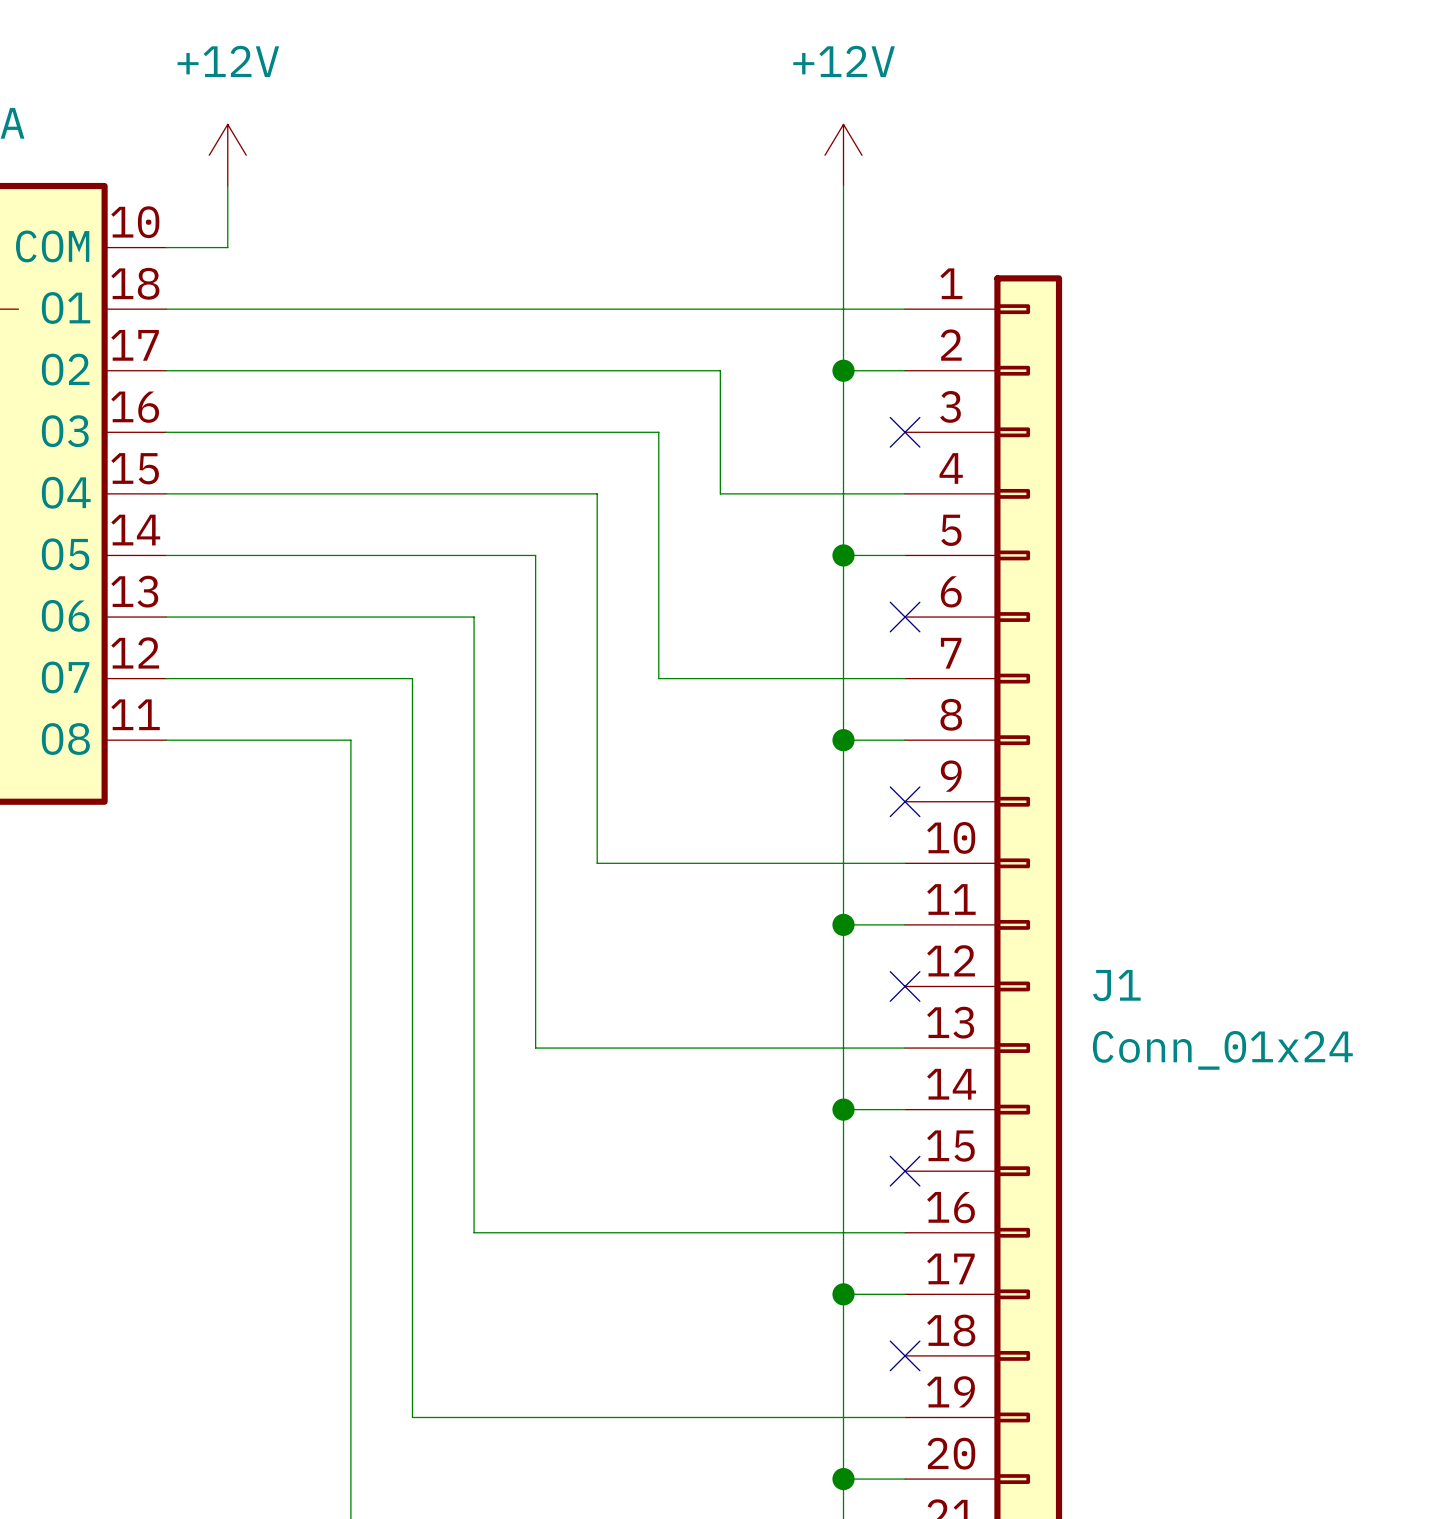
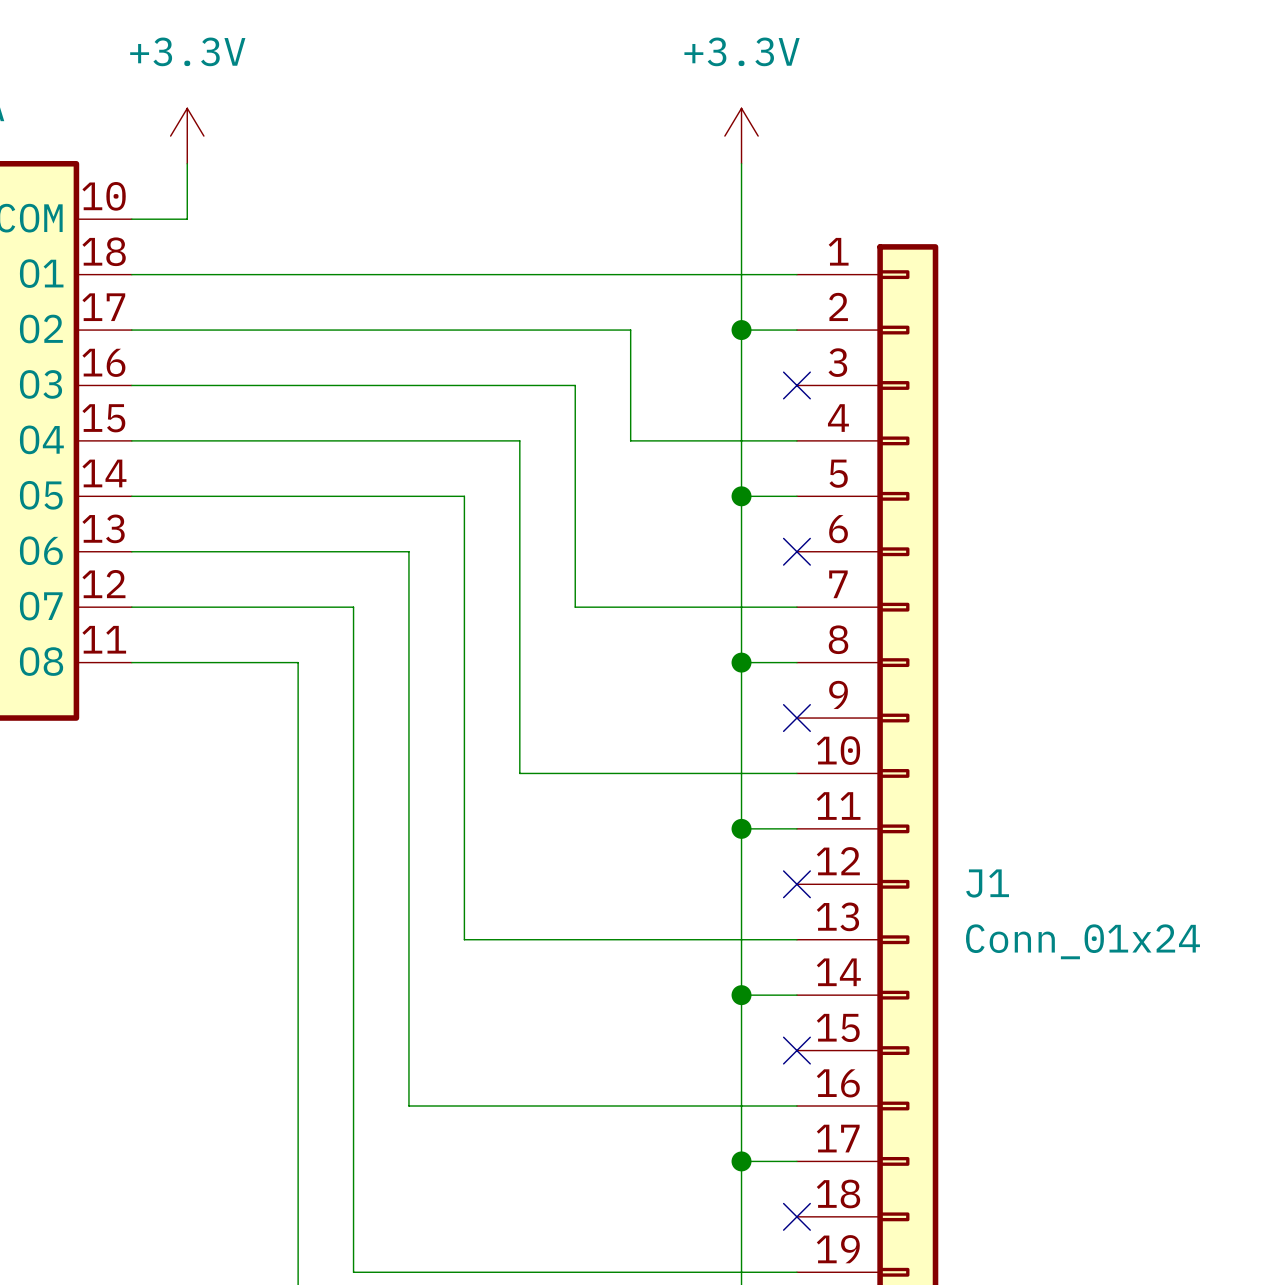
power symbol: +12V (227, 155) -> +3.3V (187, 136)
power symbol: +12V (843, 155) -> +3.3V (741, 136)

